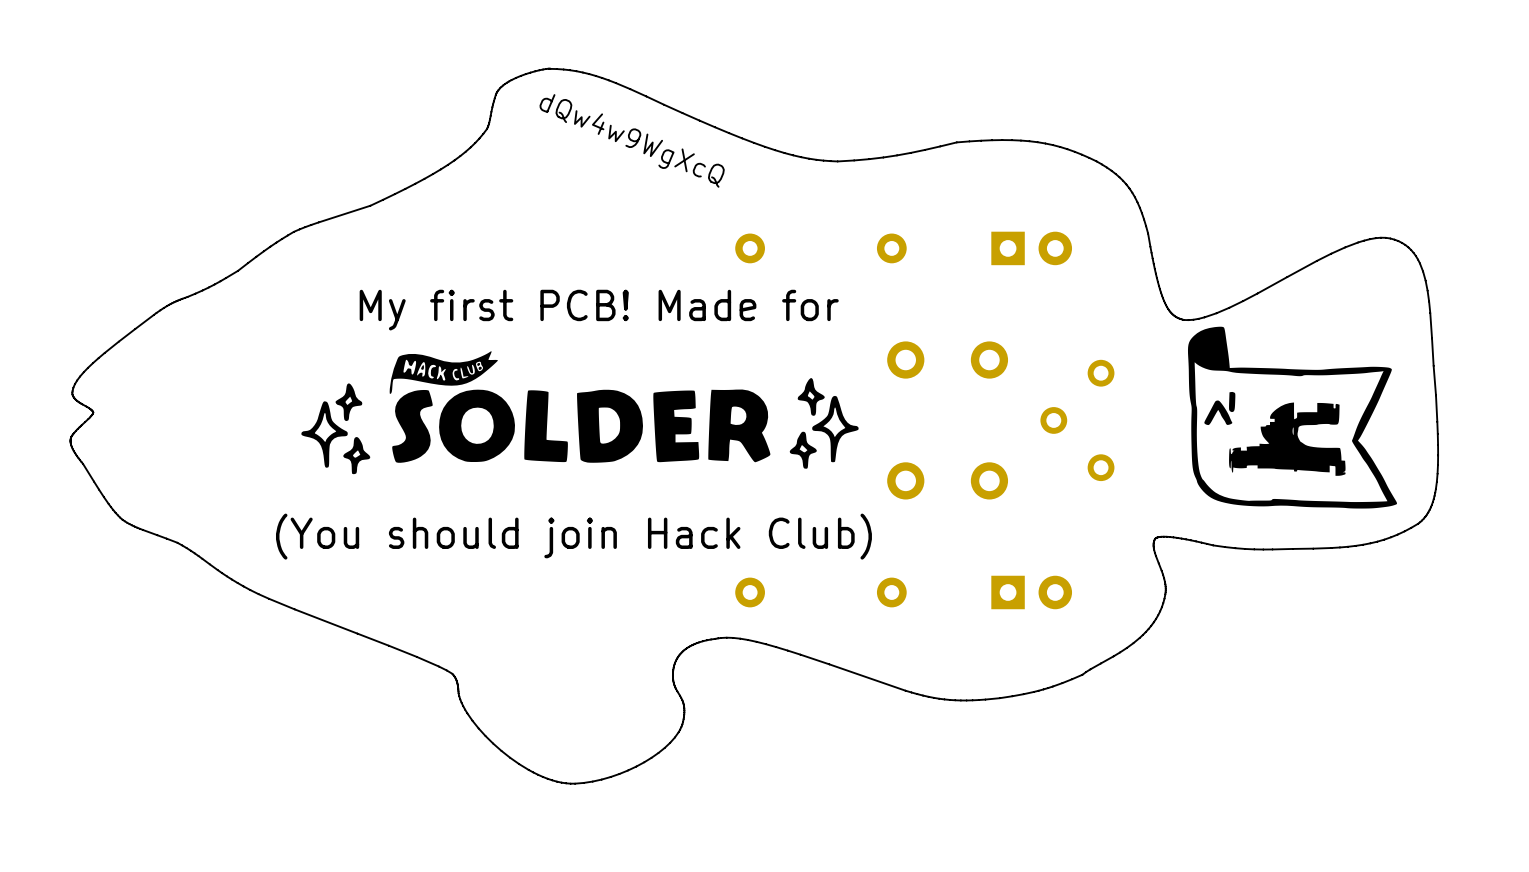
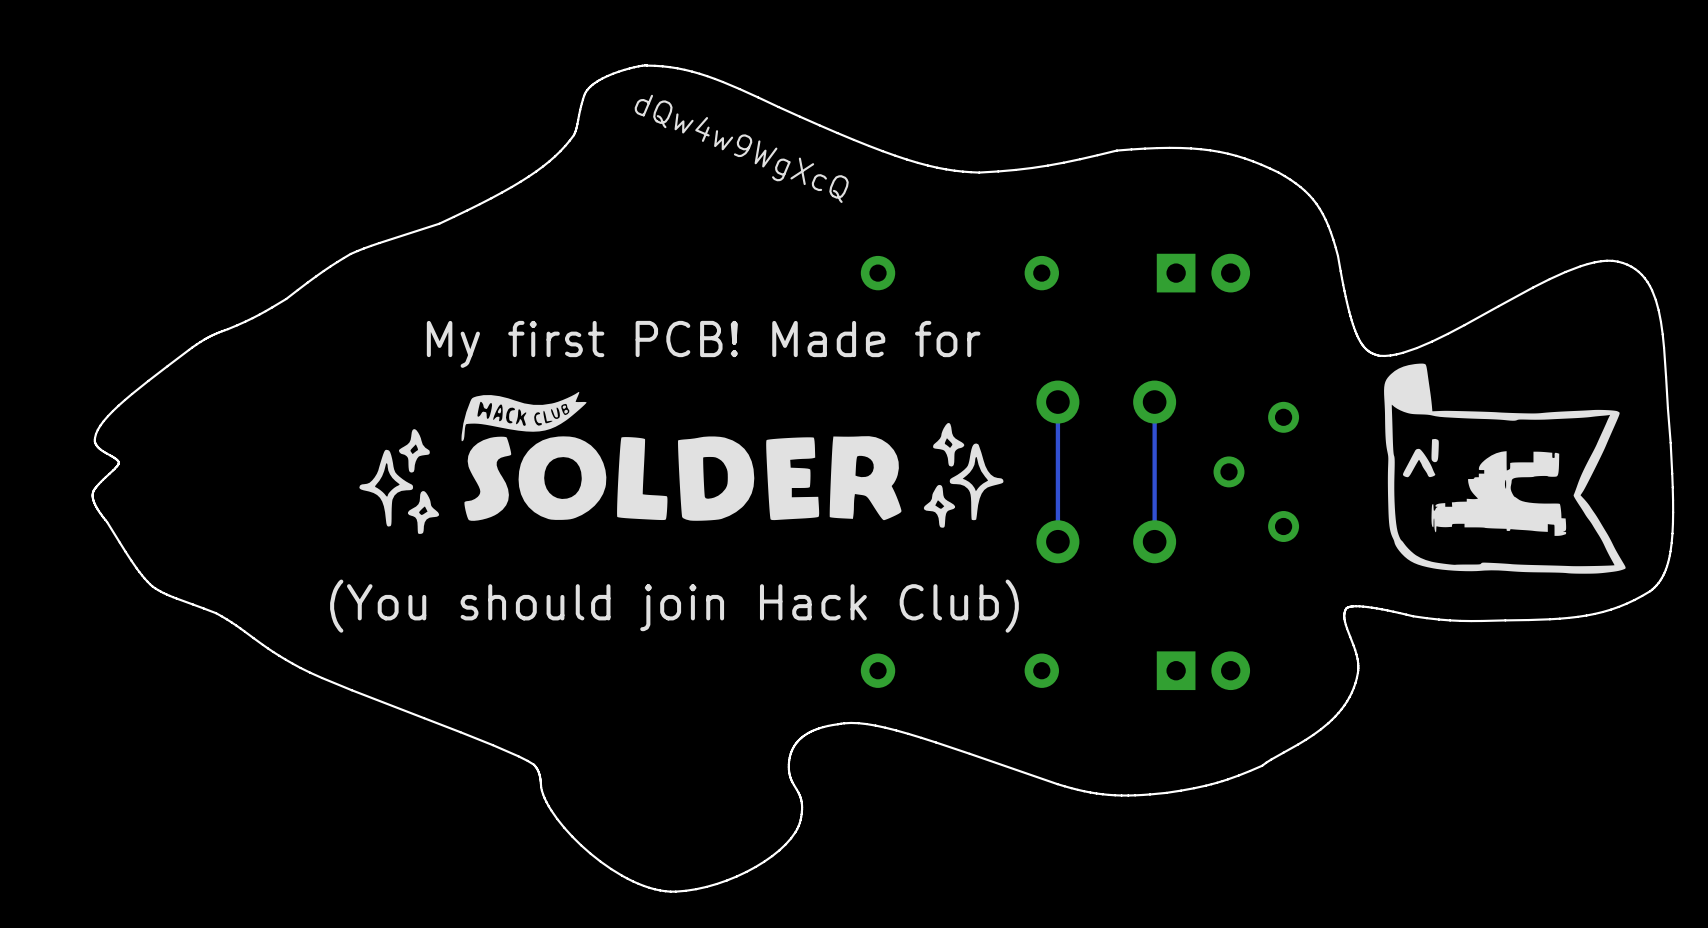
track: none -> (1057, 402) (1057, 541)
track: none -> (1154, 402) (1154, 541)

